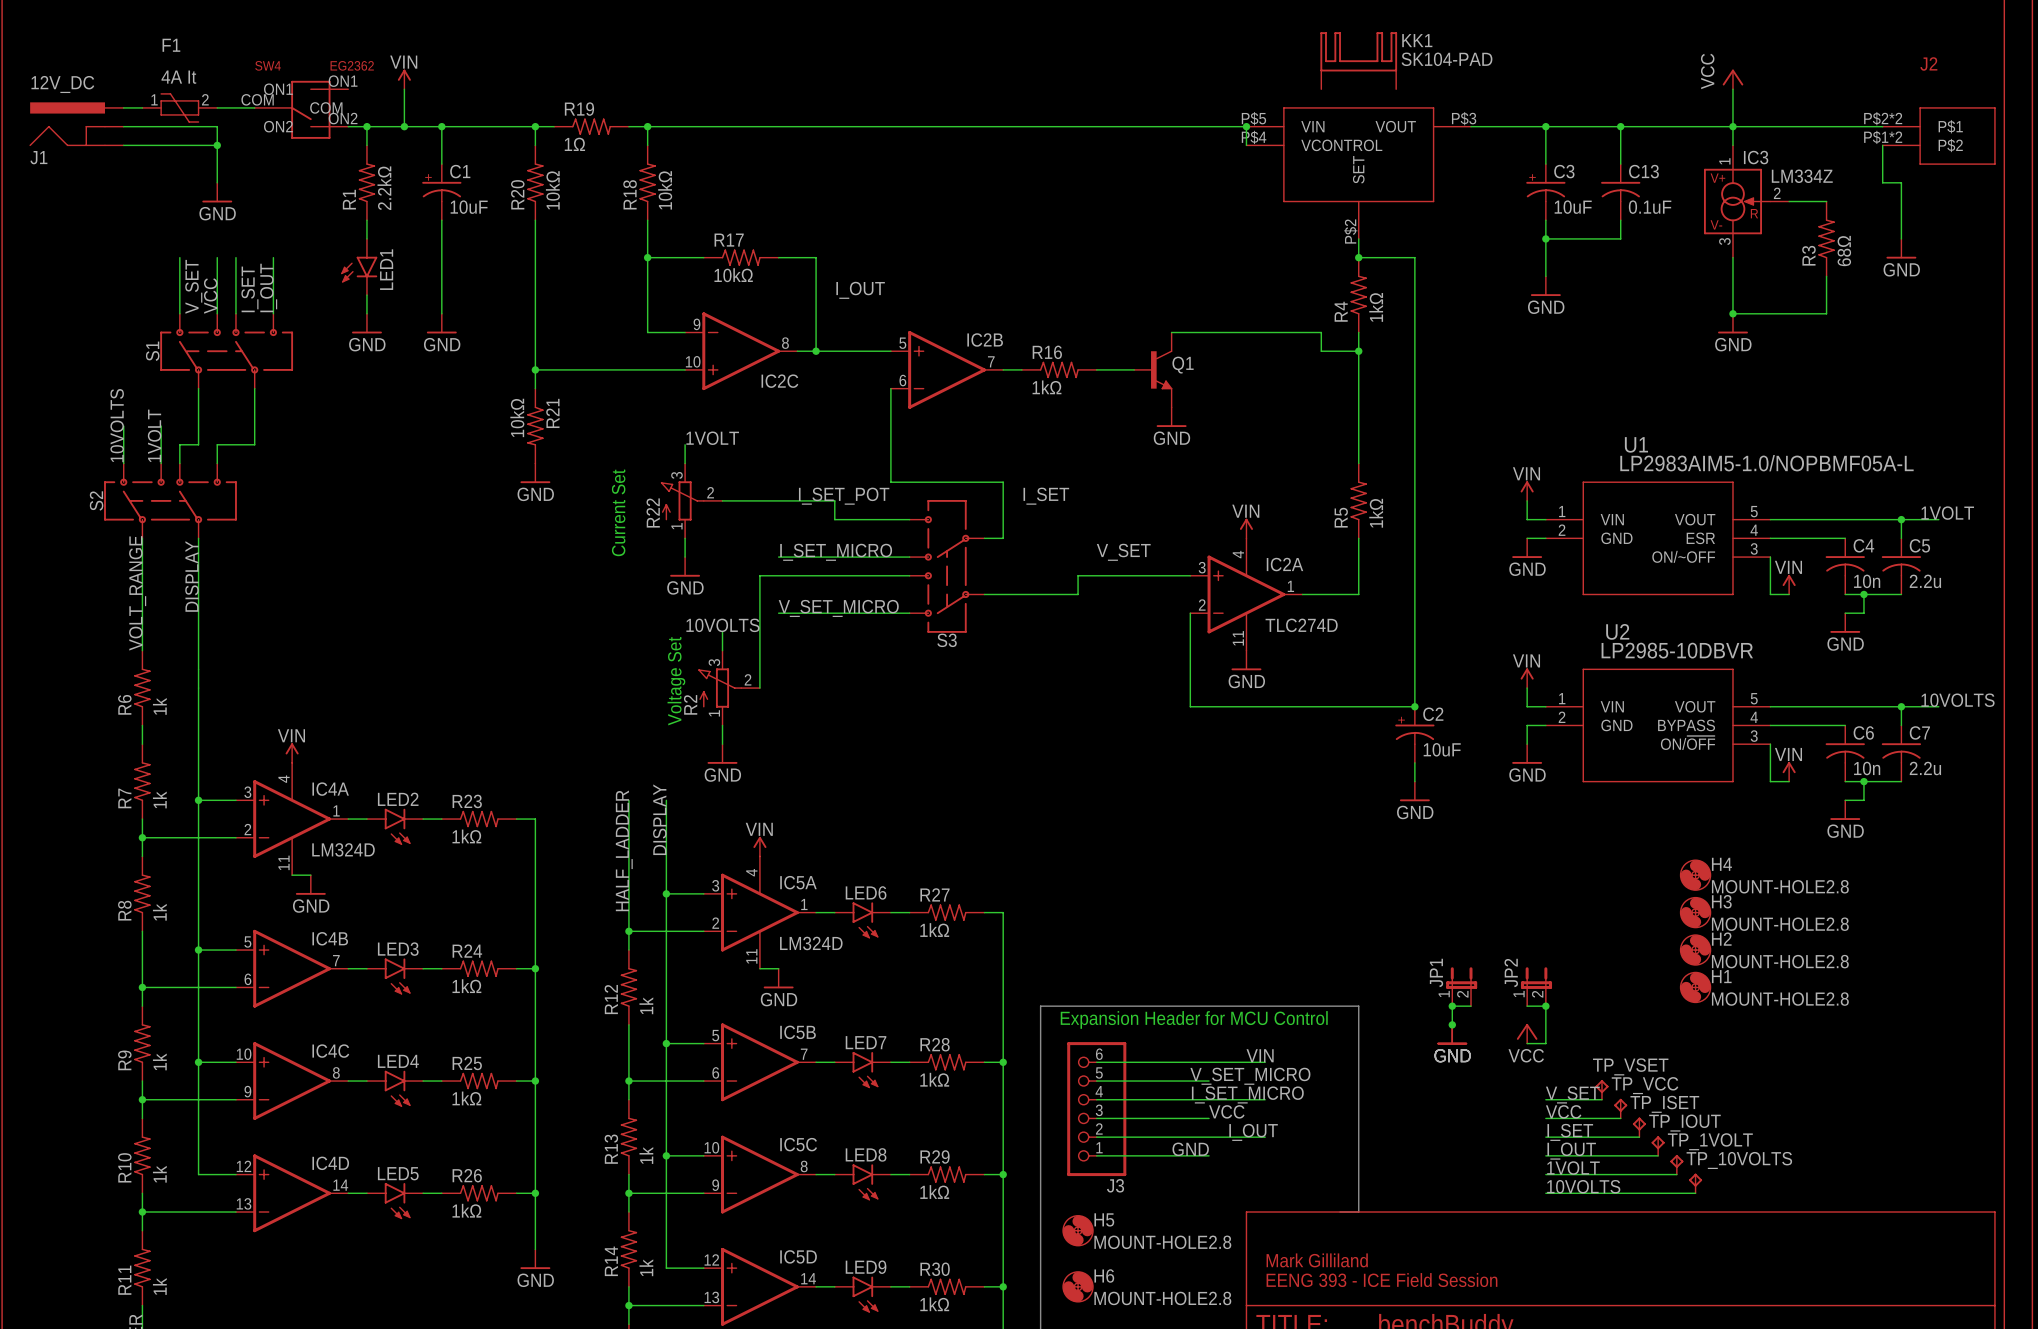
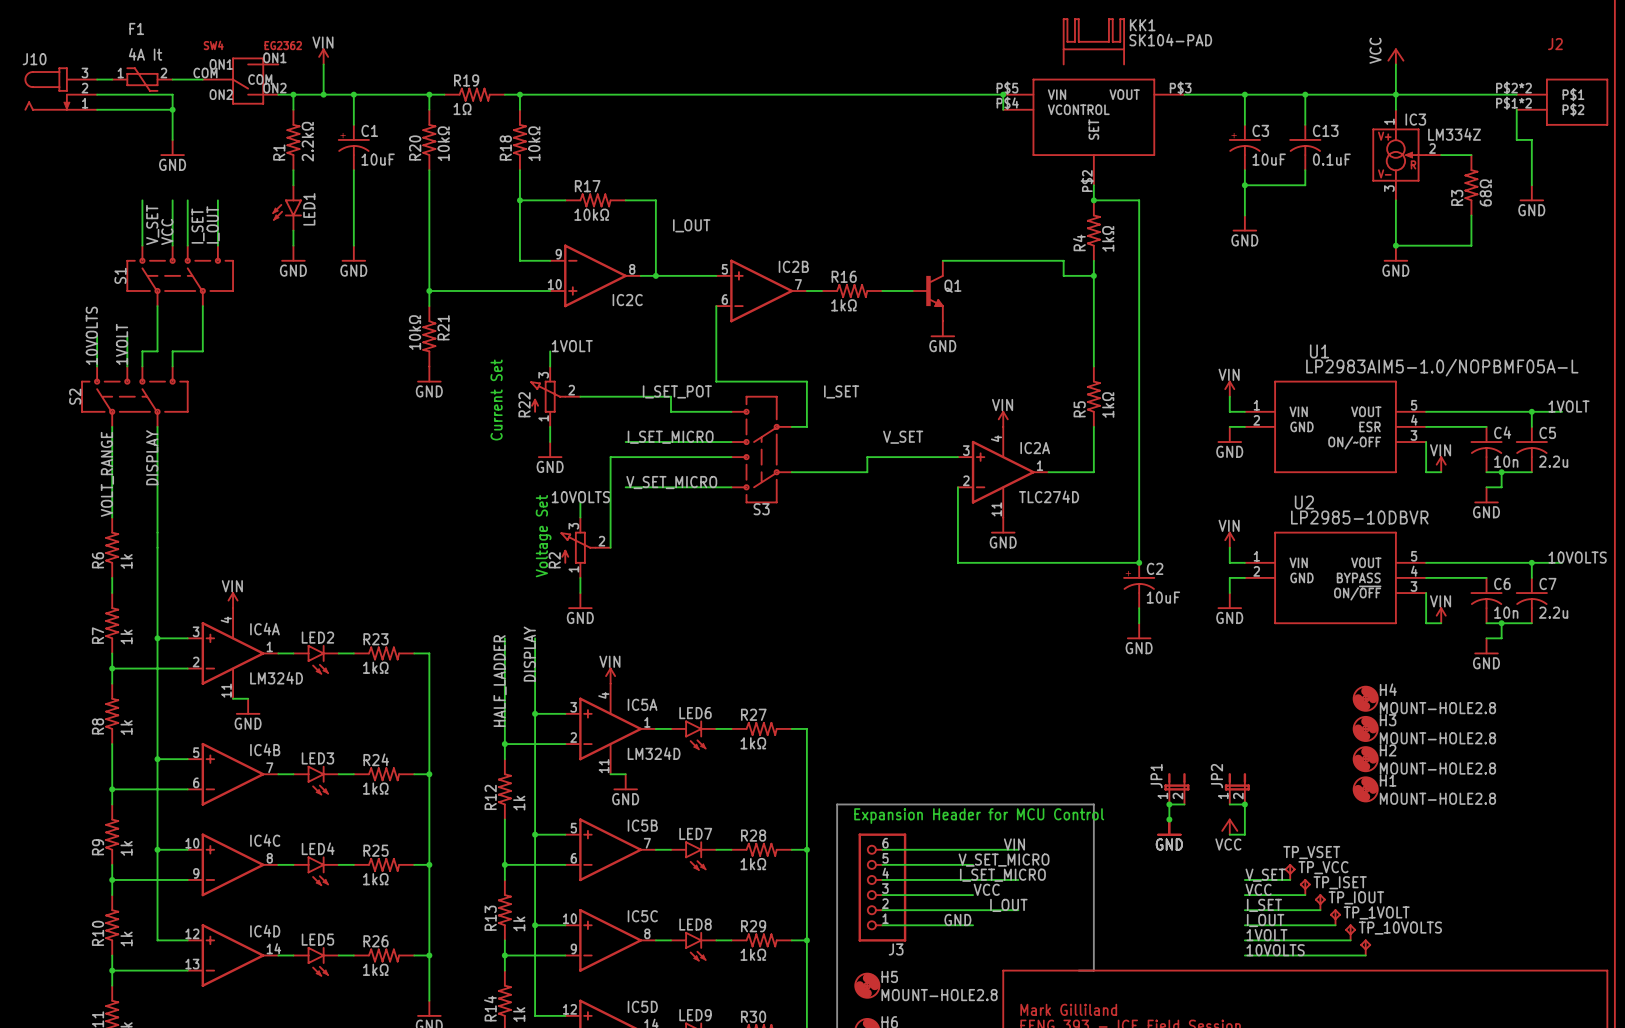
J10: none -> (61, 88)
J1: 12V_DC (76, 124) -> none

